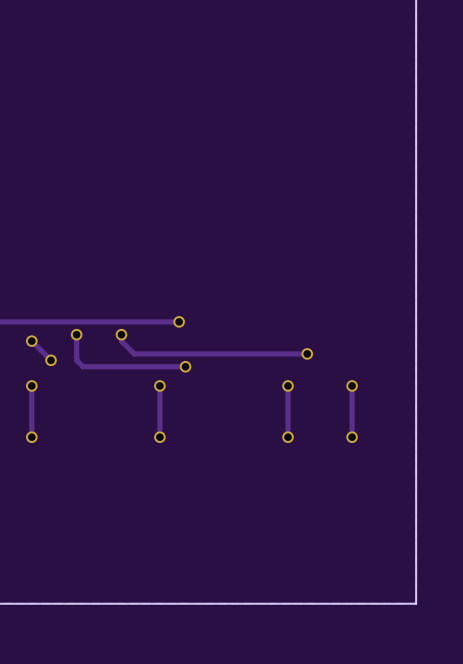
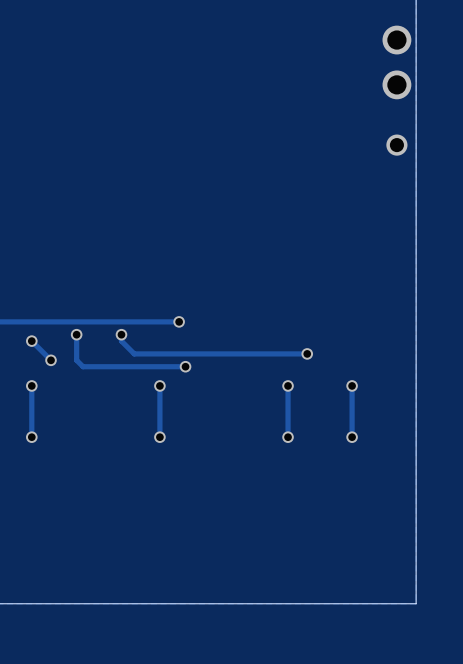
via: none -> (396, 40)
via: none -> (396, 84)
via: none -> (396, 145)

